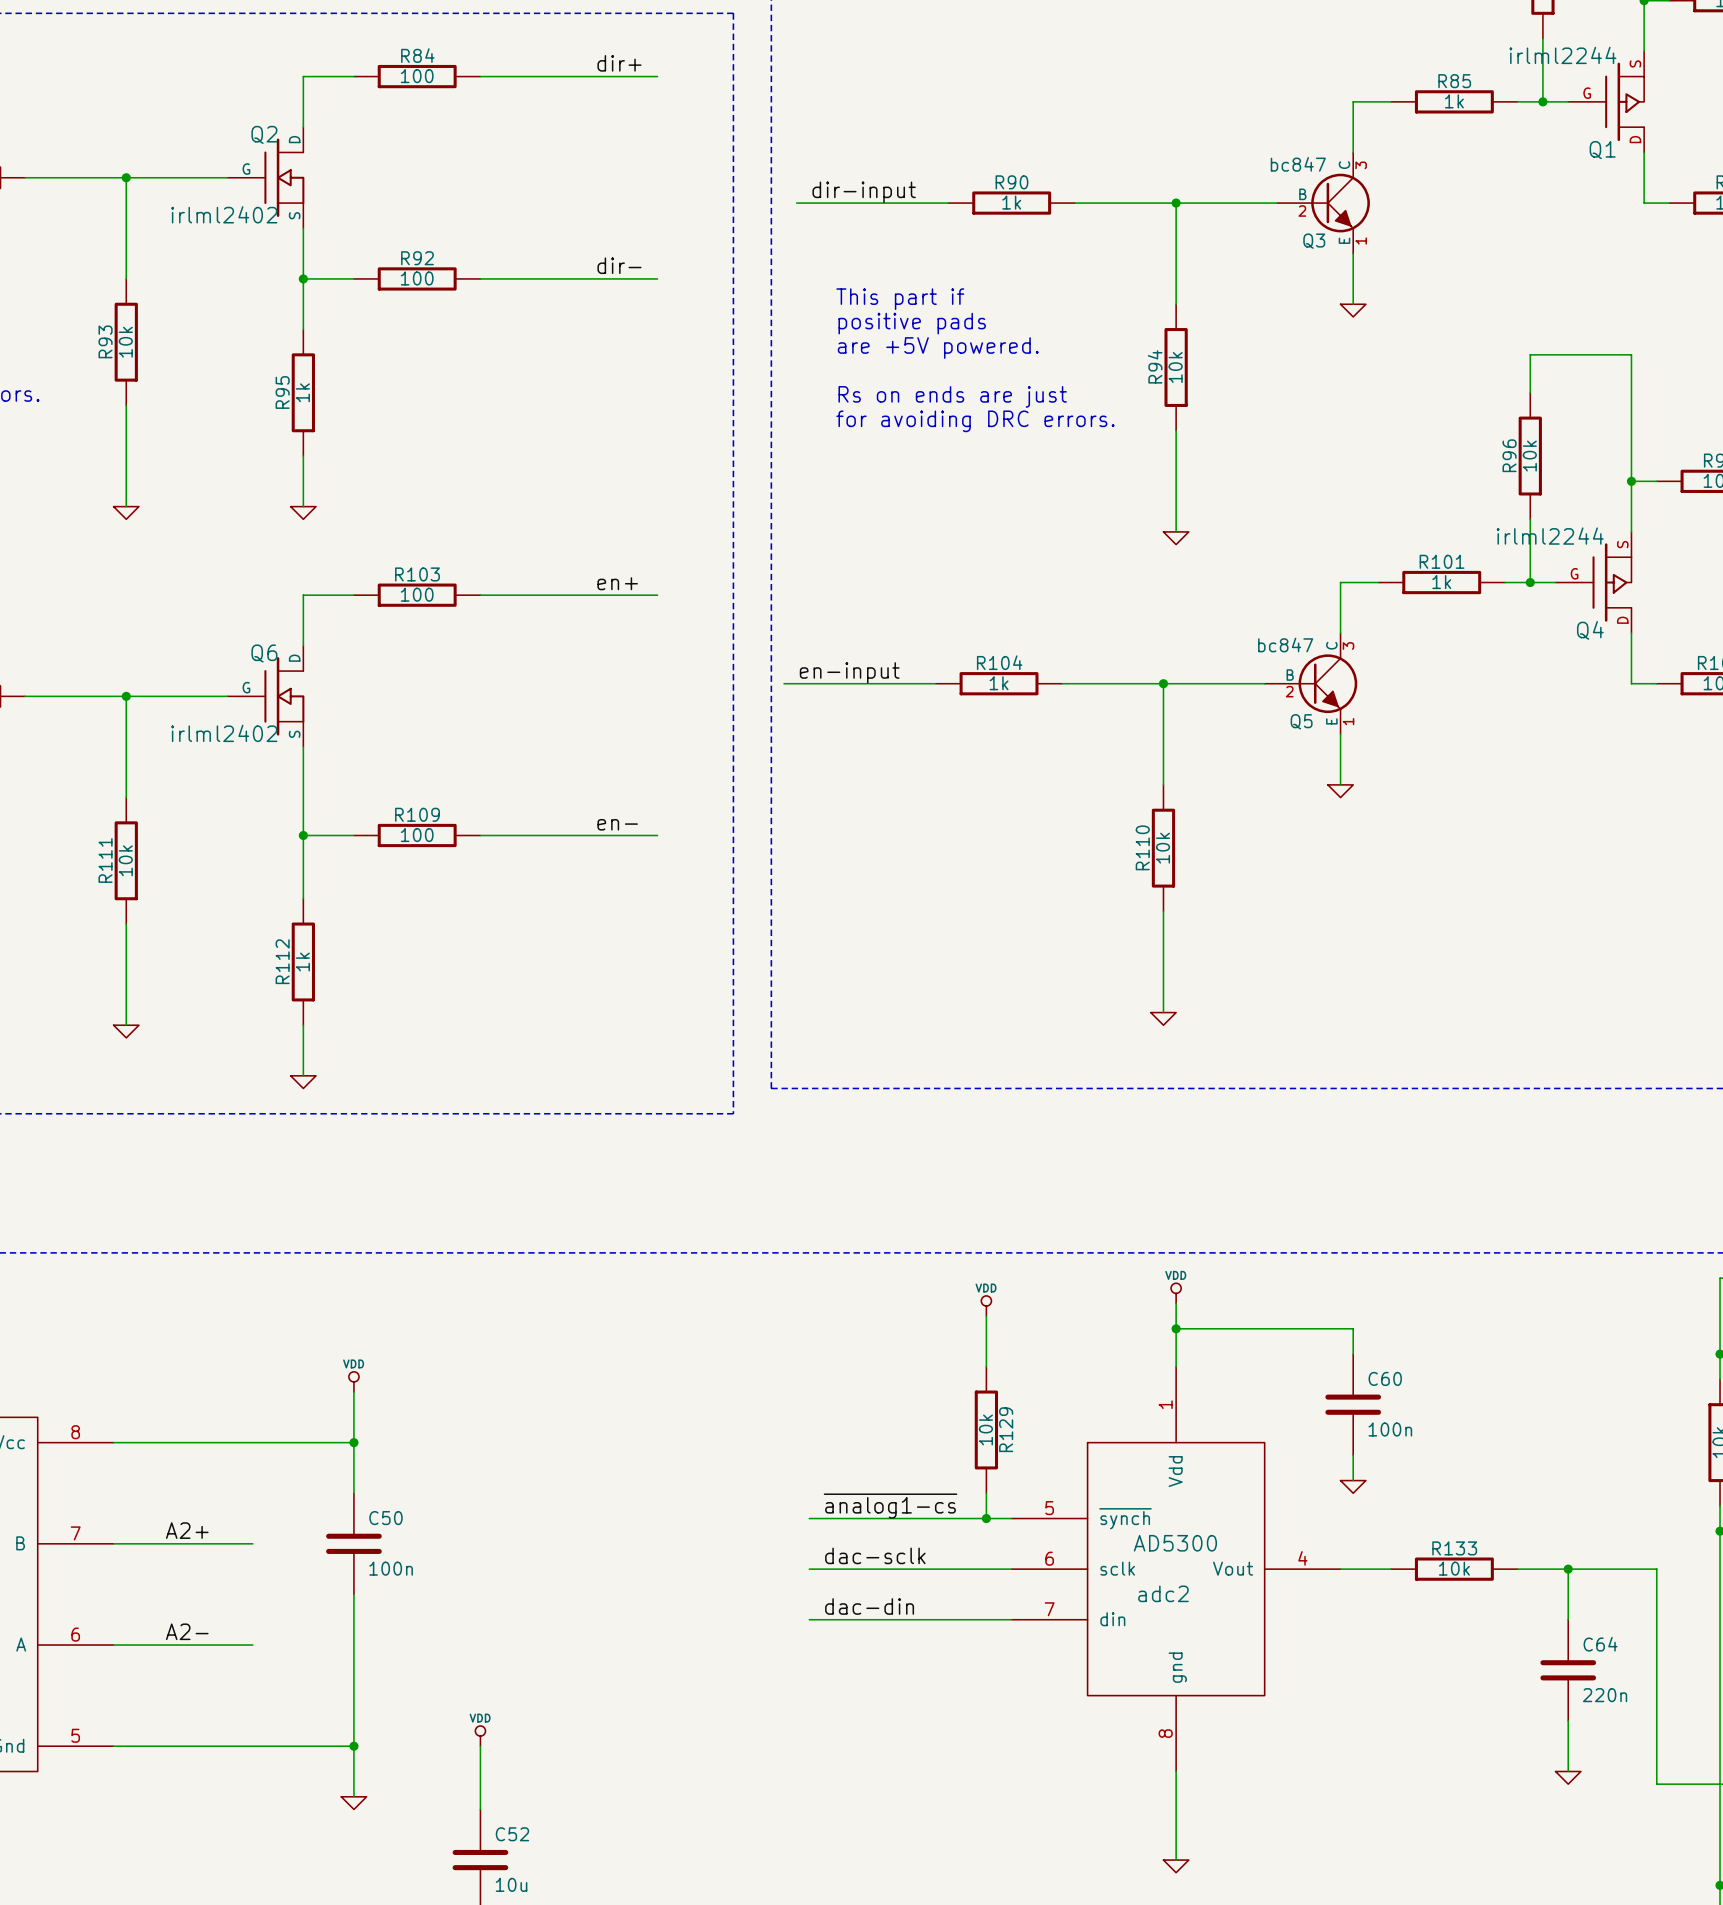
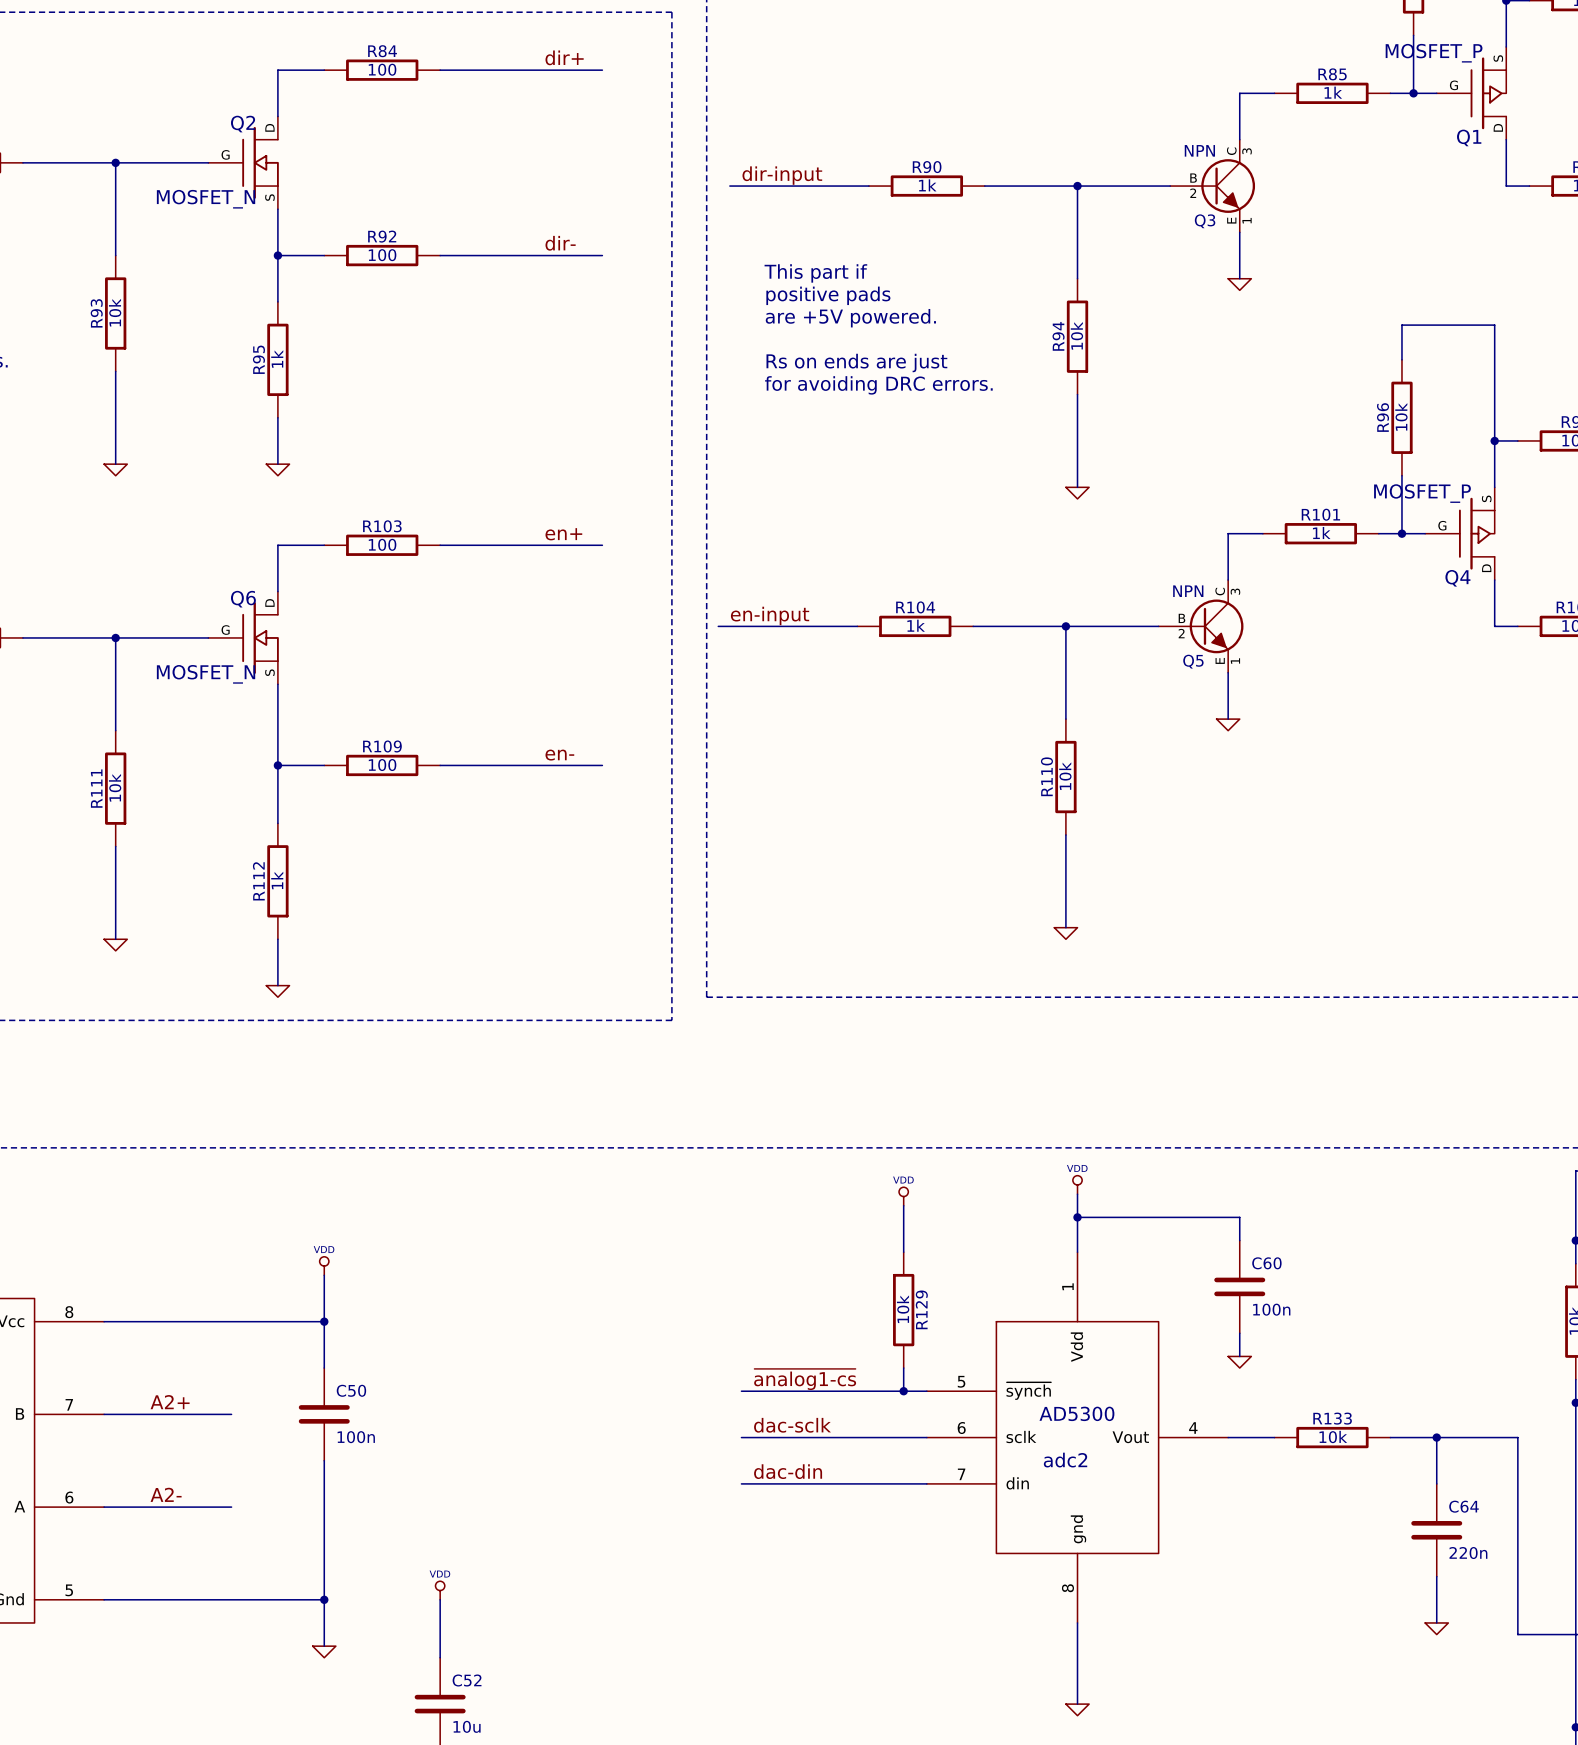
Q1 value: irlml2244 (1562, 55) -> MOSFET_P (1434, 53)
Q3 value: bc847 (1298, 164) -> NPN (1199, 150)
Q2 value: irlml2402 (224, 214) -> MOSFET_N (206, 199)
Q4 value: irlml2244 (1550, 536) -> MOSFET_P (1422, 493)
Q5 value: bc847 (1285, 644) -> NPN (1188, 591)
Q6 value: irlml2402 (224, 733) -> MOSFET_N (206, 674)

